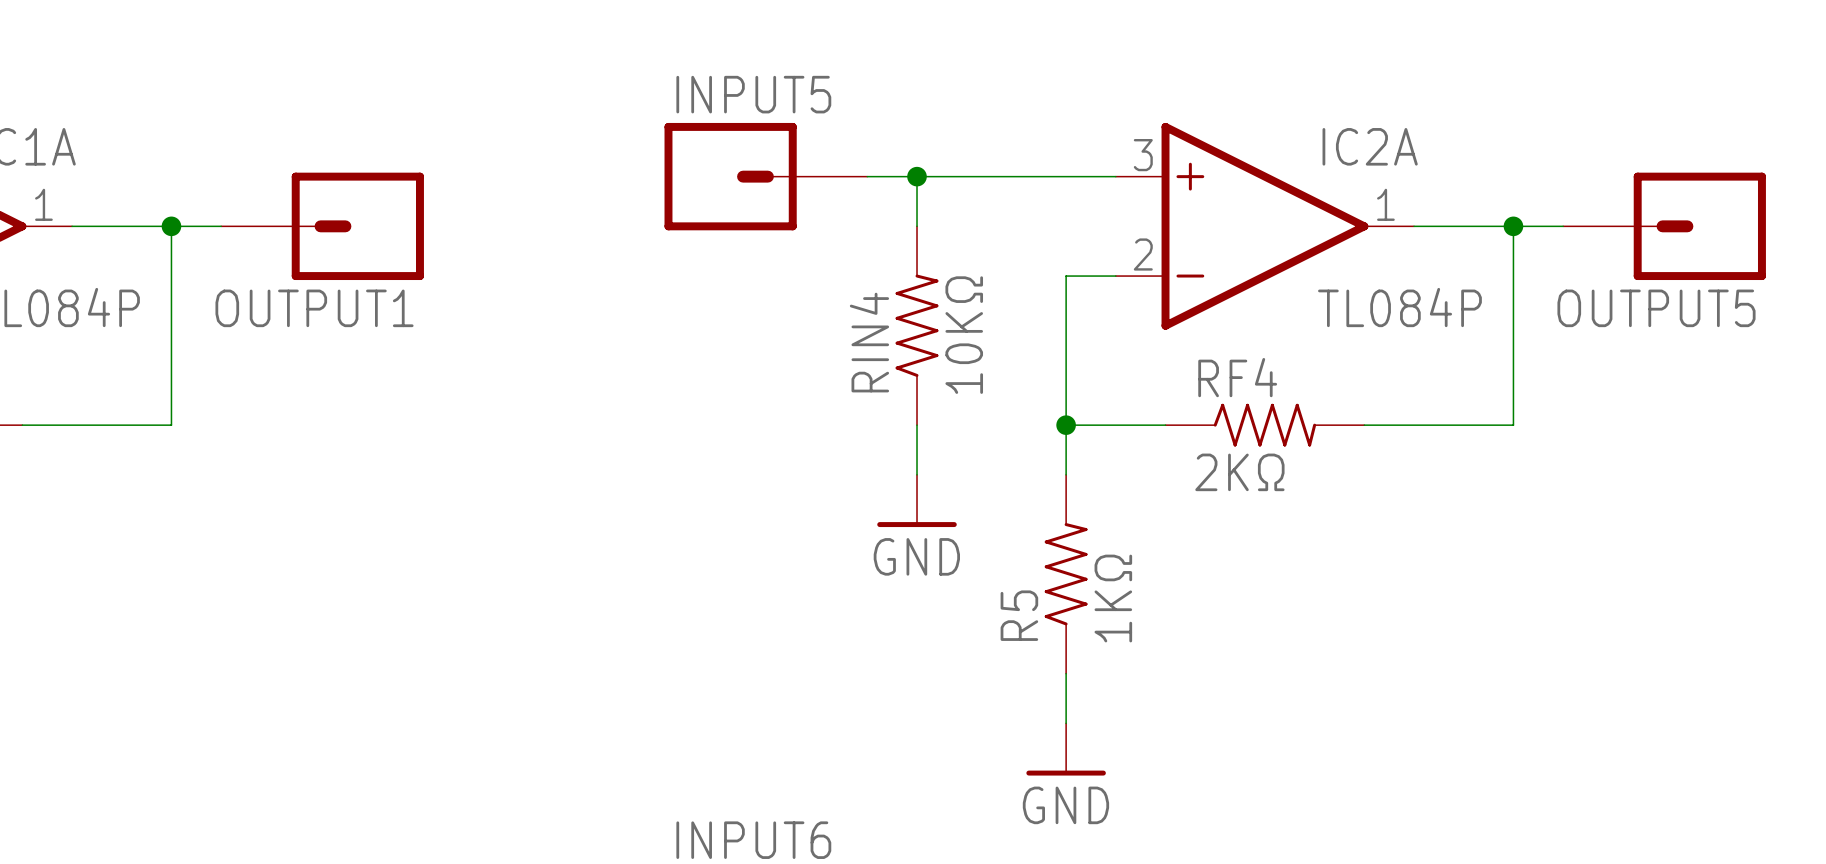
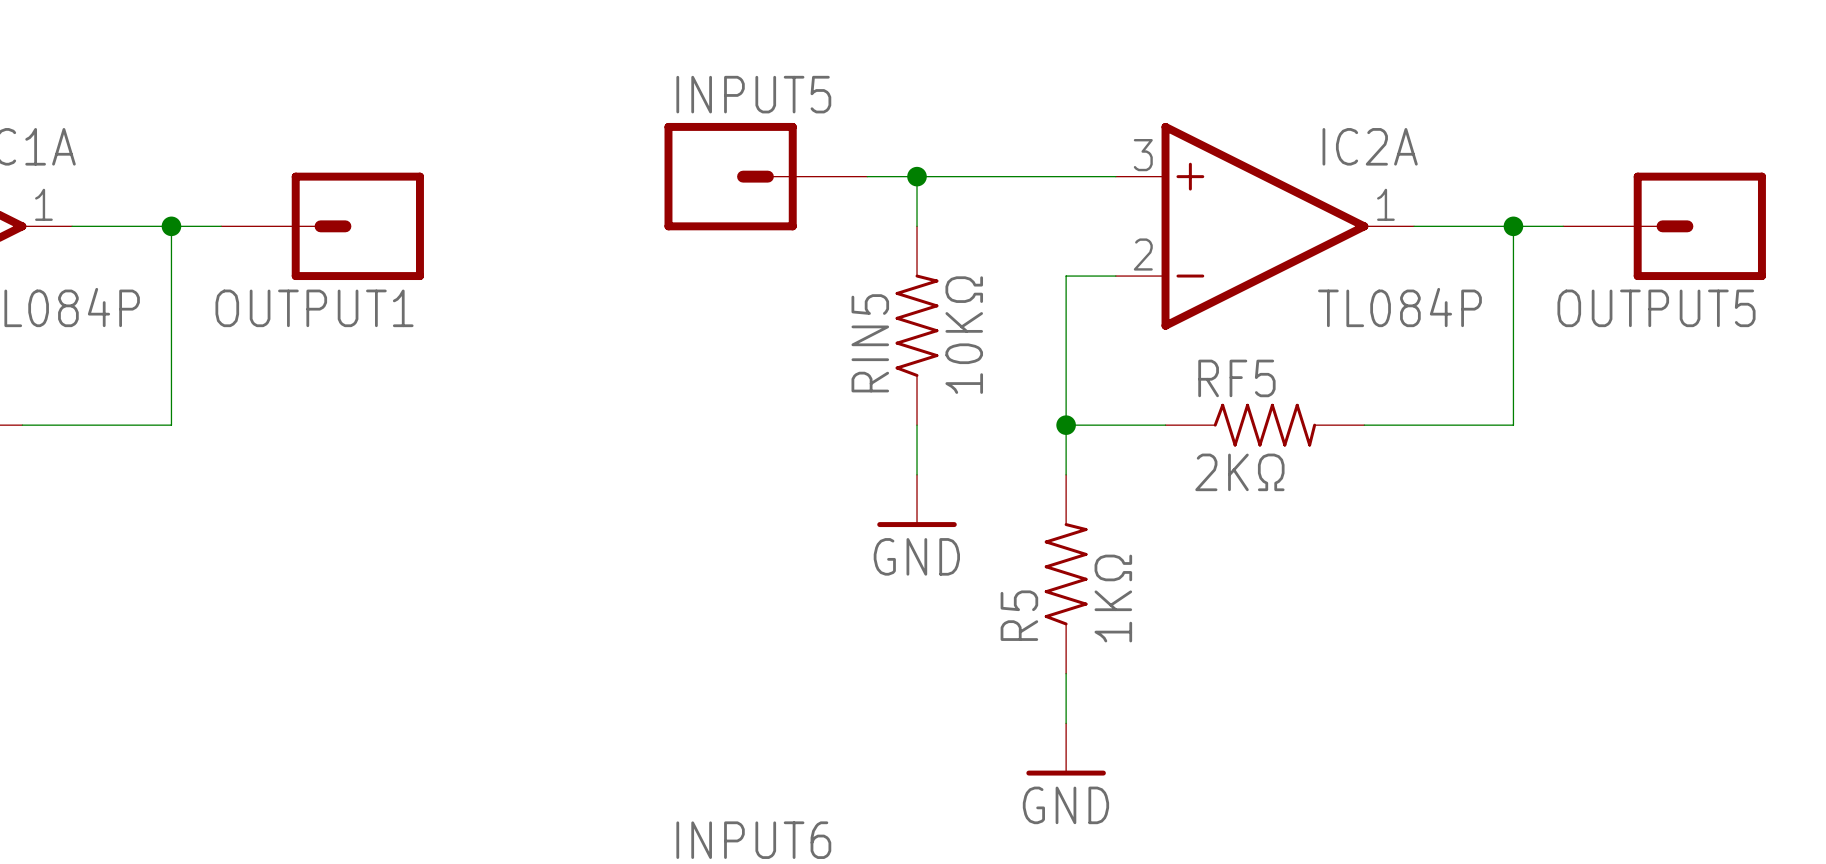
RIN4 name: RIN4 (869, 342) -> RIN5 (870, 343)
RF4 name: RF4 (1237, 377) -> RF5 (1236, 378)

